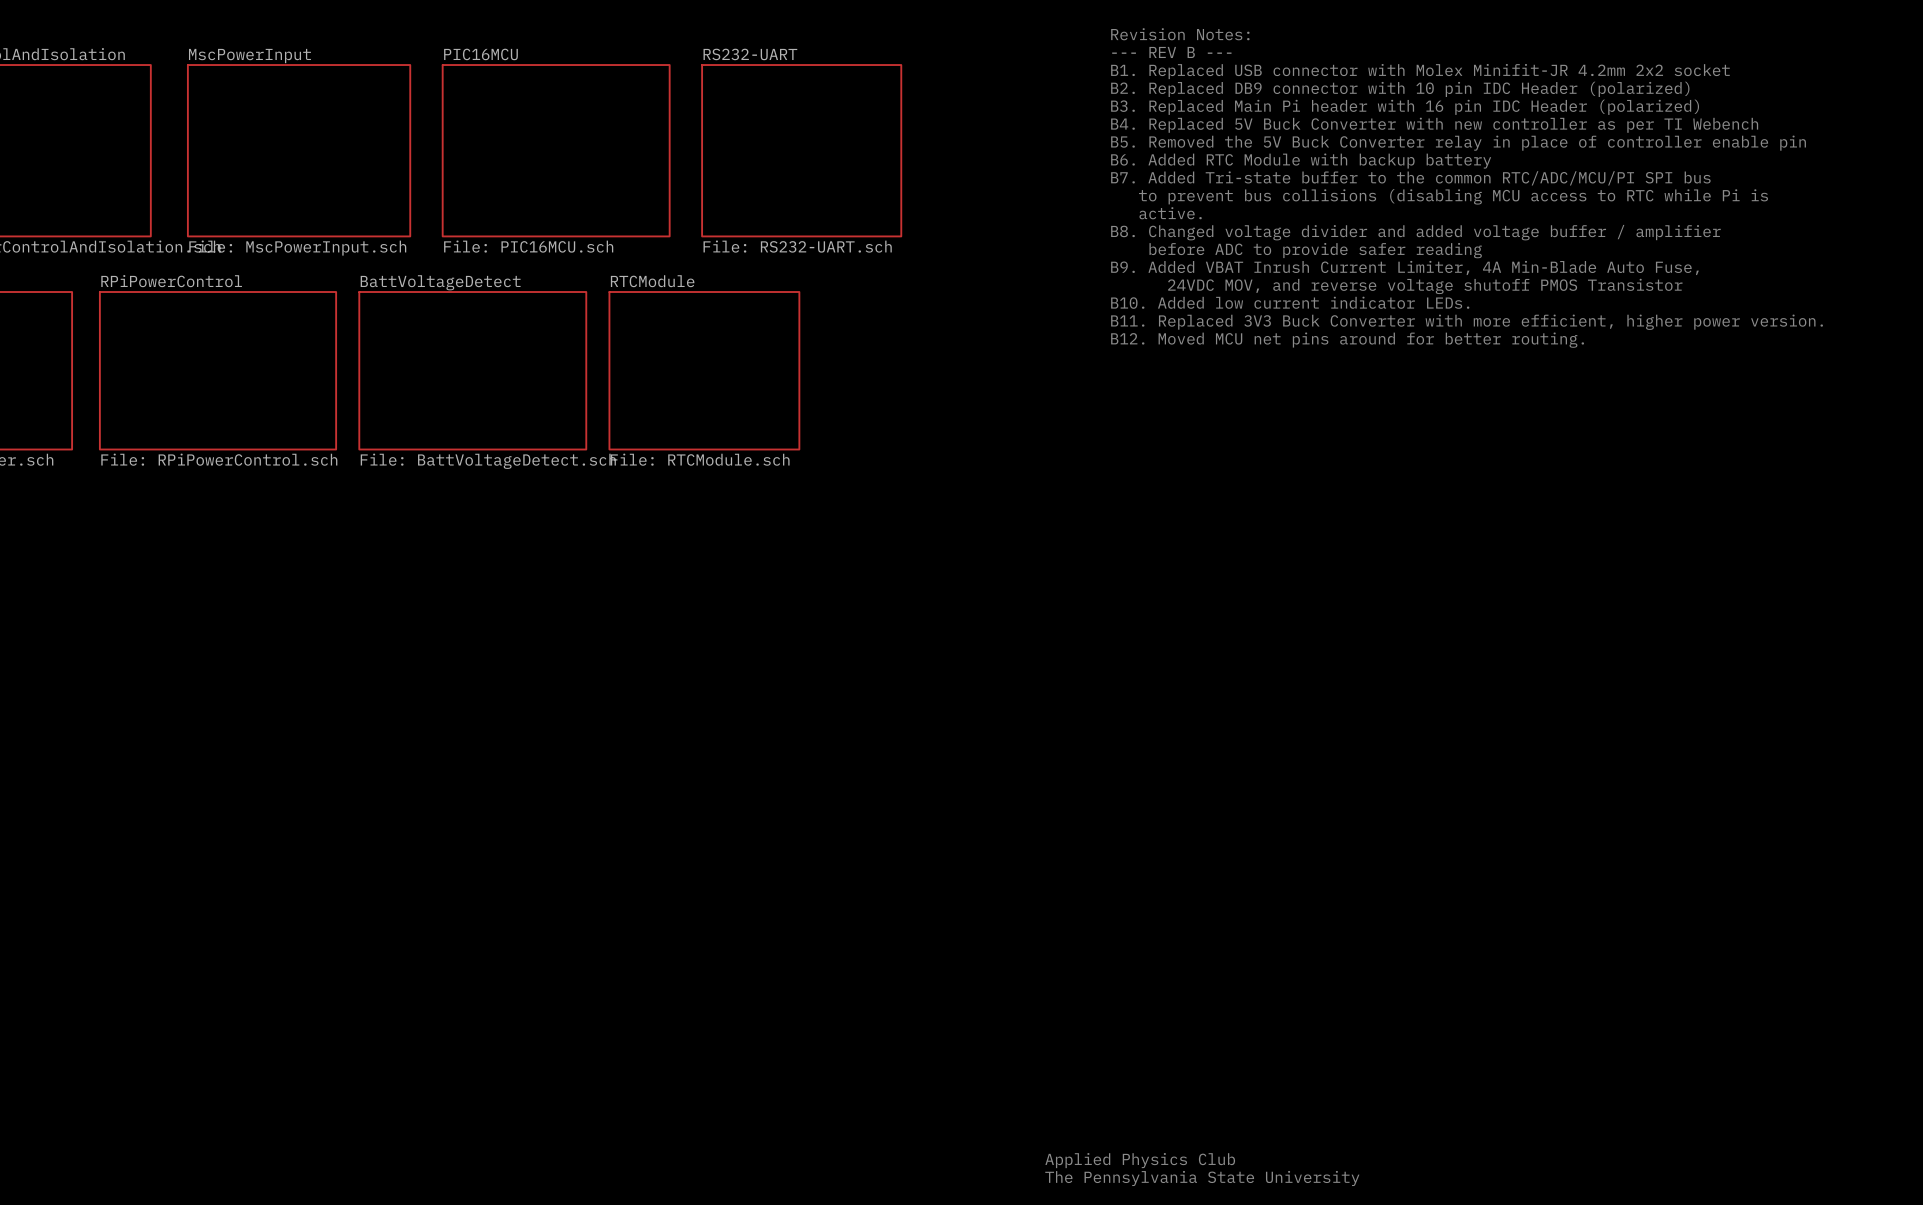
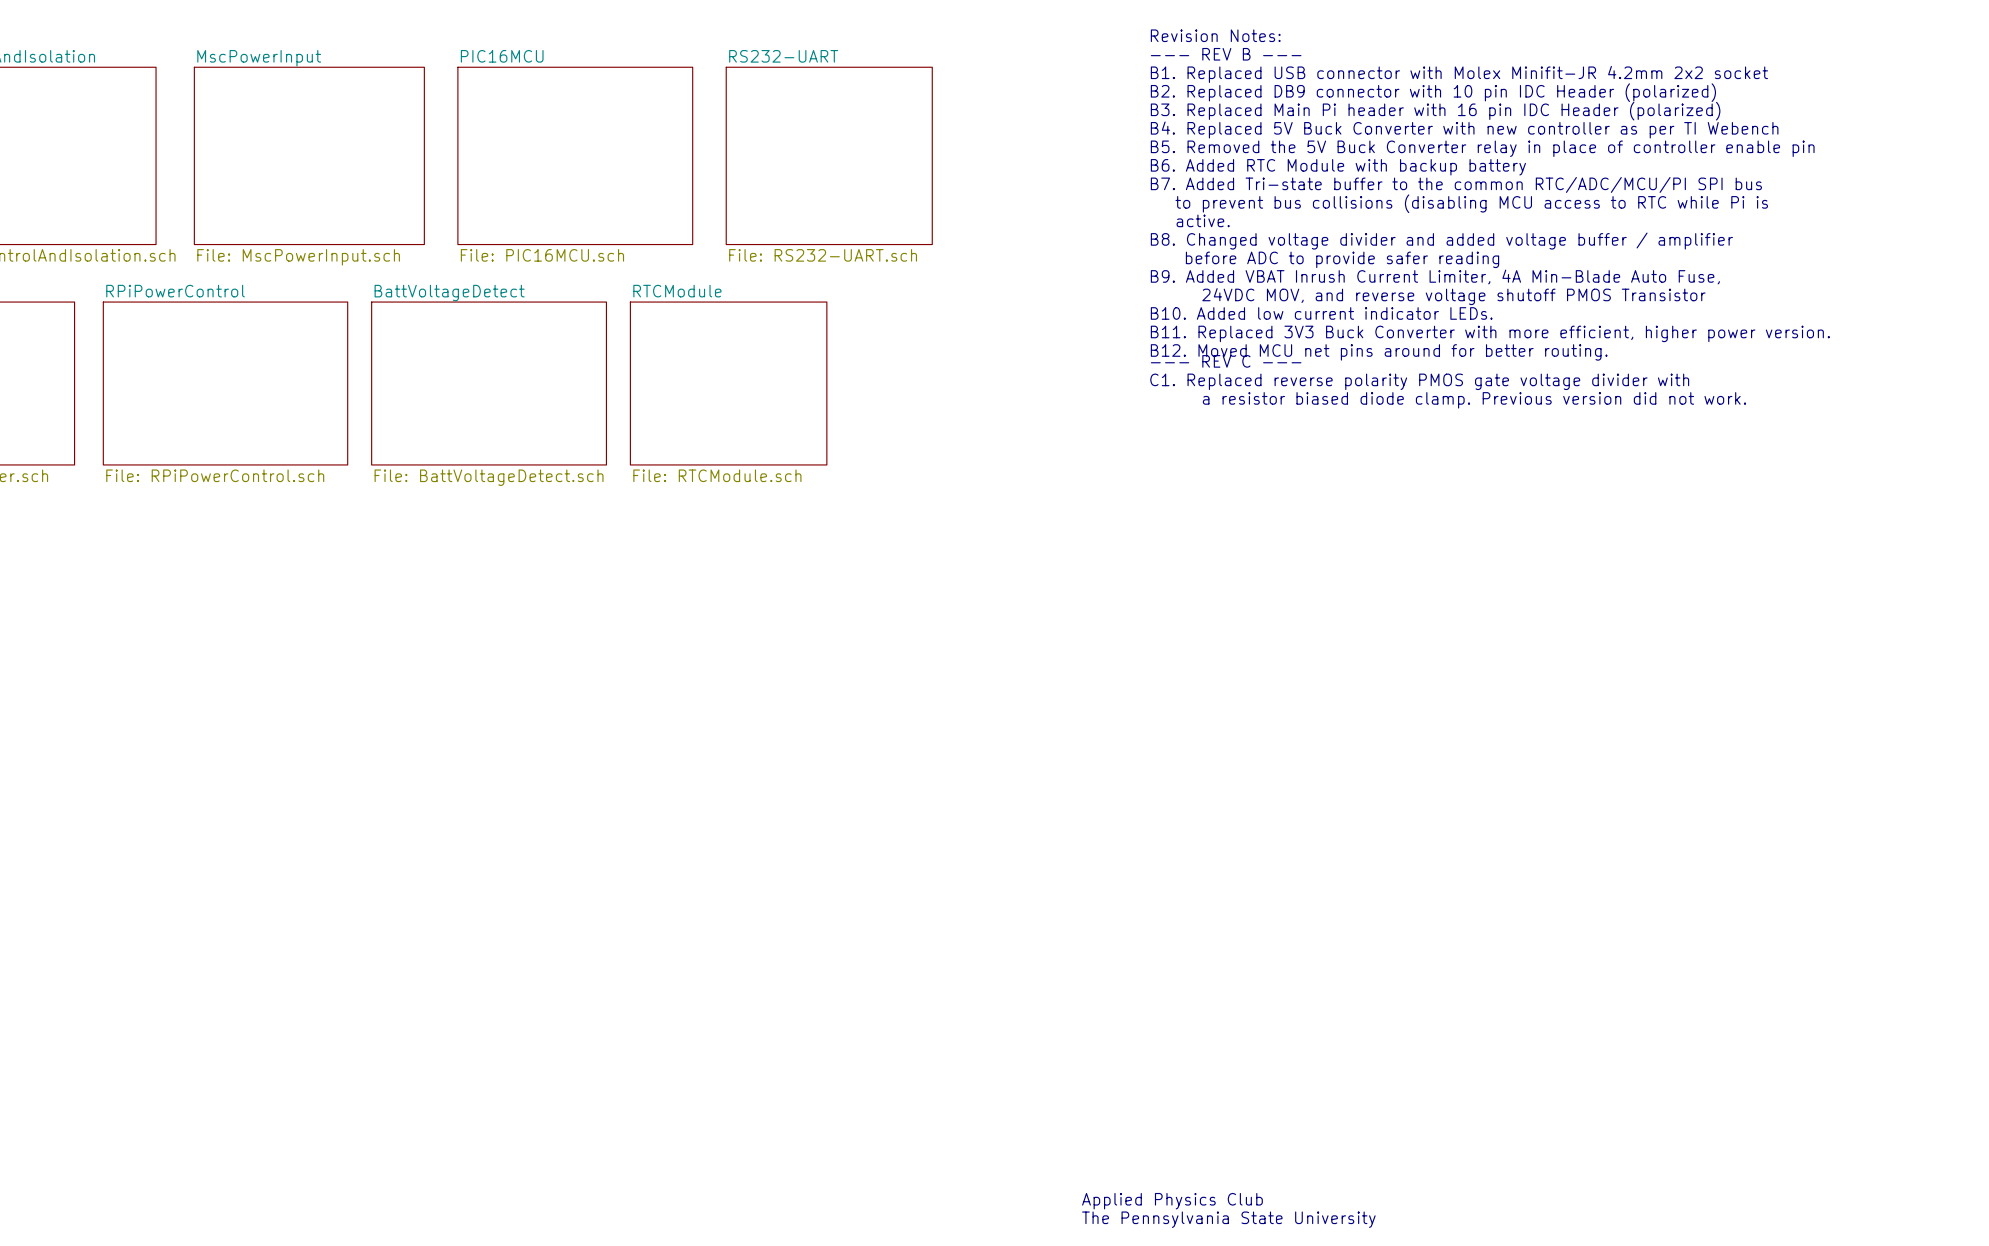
text: none -> --- REV C --- (1226, 361)
text: none -> C1. Replaced reverse polarity PMOS gate voltage divider with (1419, 381)
text: none -> a resistor biased diode clamp. Previous version did not work. (1474, 400)

